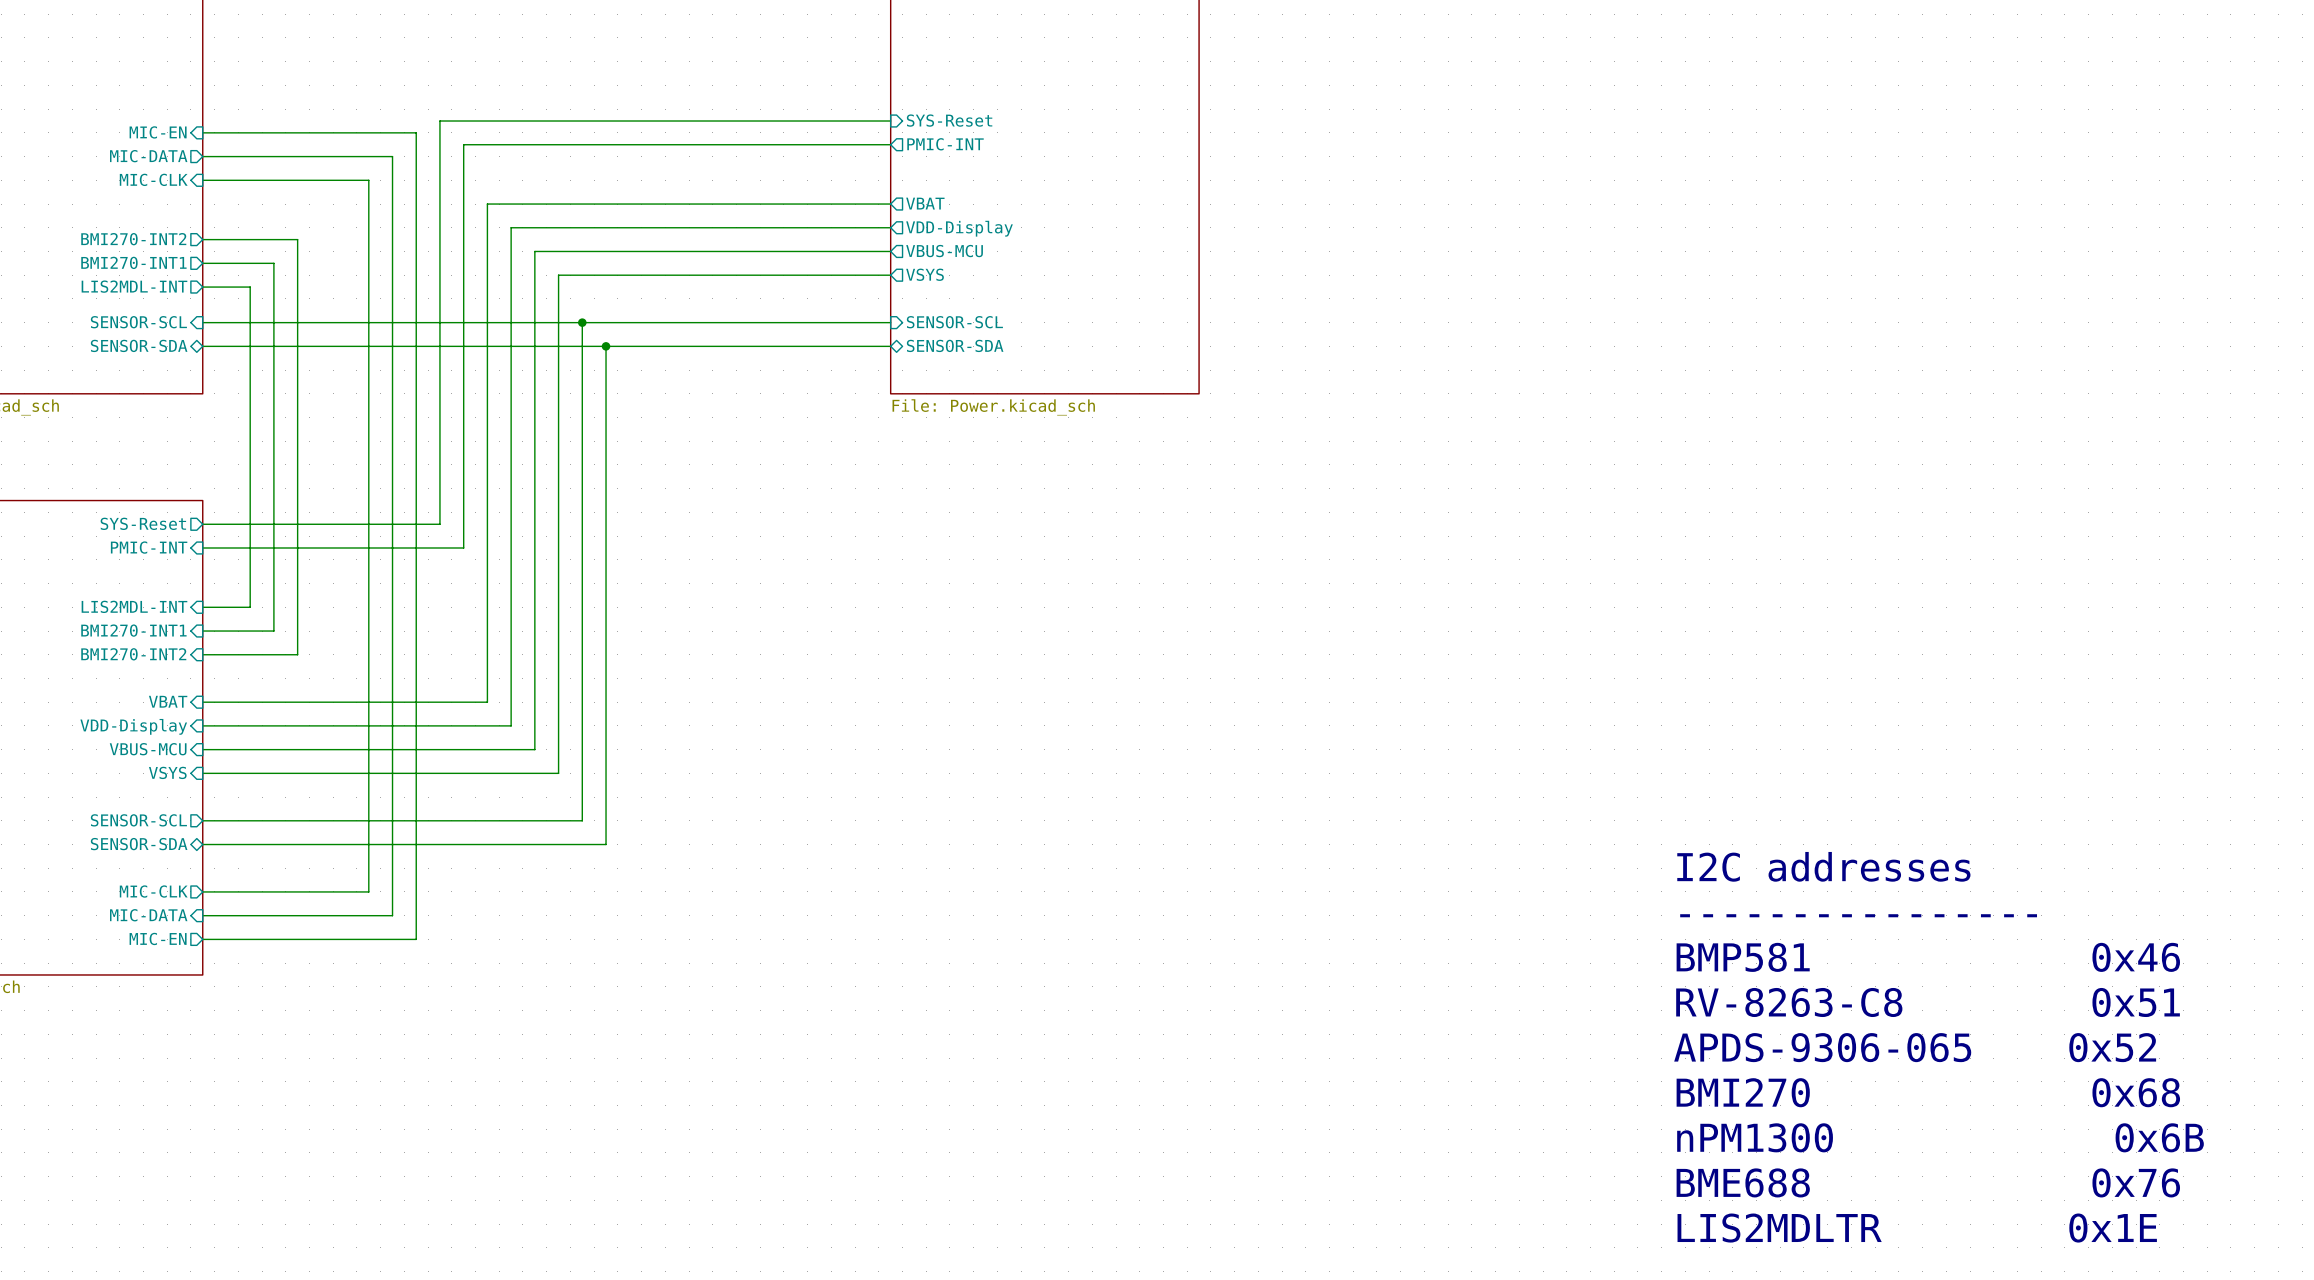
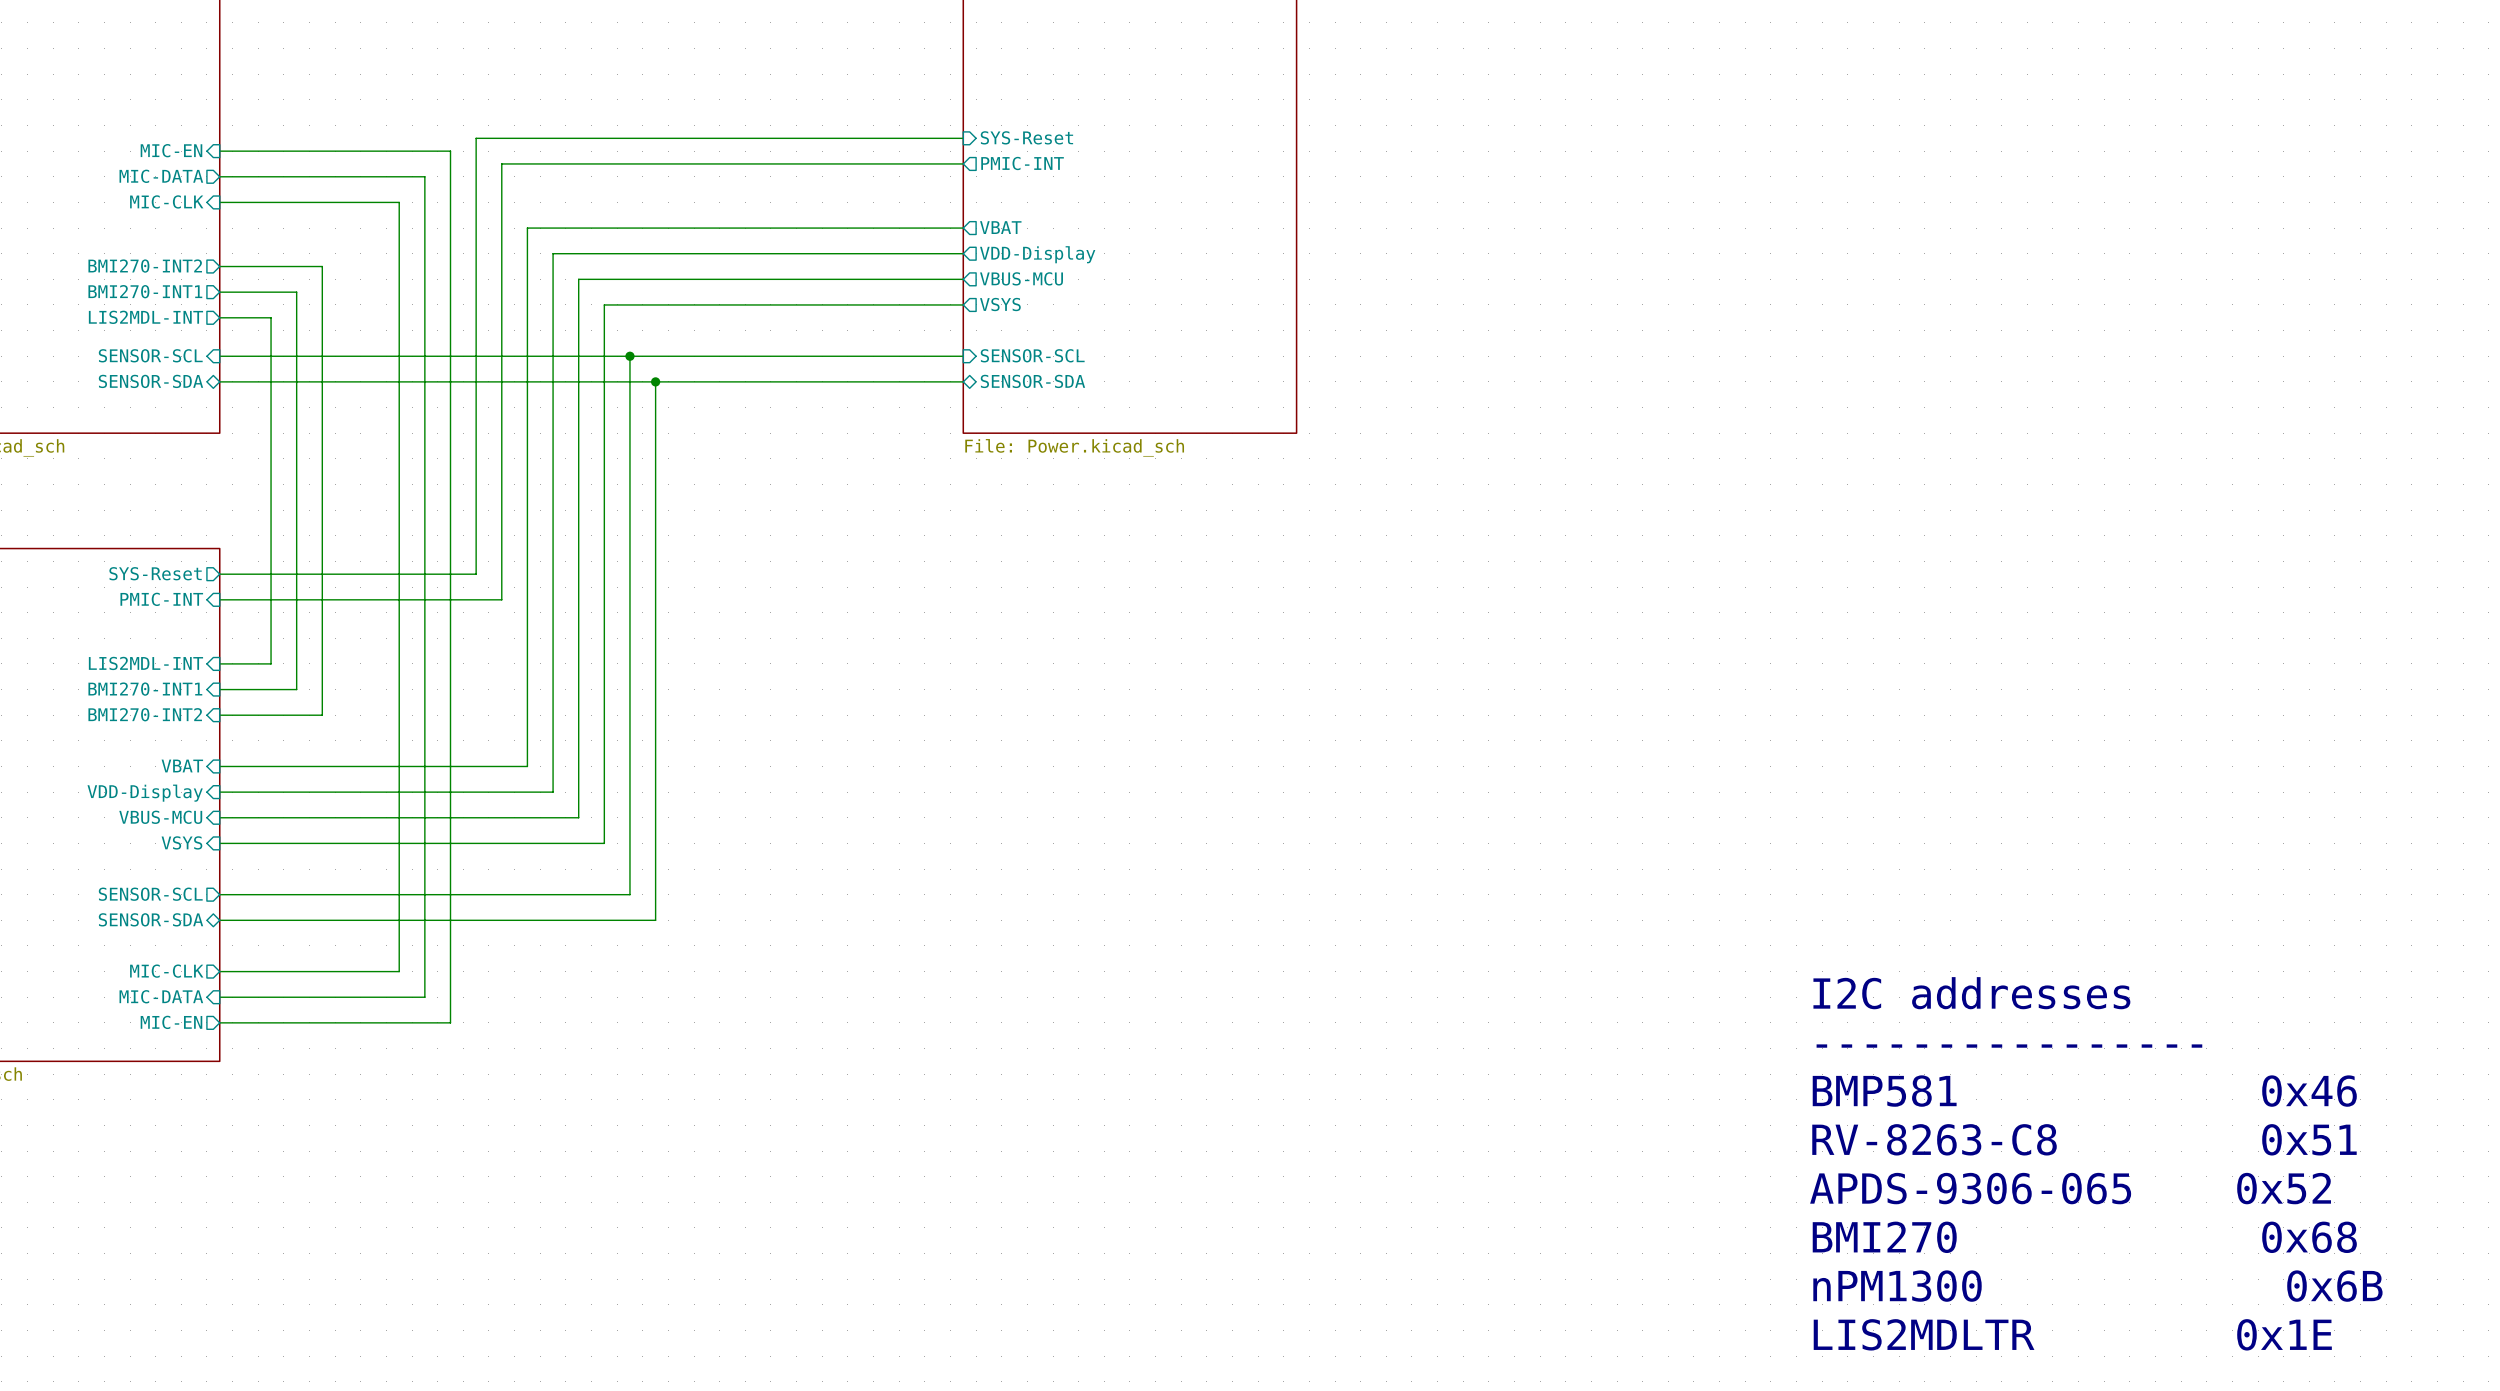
text: I2C addresses (1823, 866) -> none
text: ---------------- (1858, 915) -> I2C addresses (1971, 993)
text: BMP581 0x46 (1928, 957) -> ---------------- (2009, 1046)
text: RV-8263-C8 0x51 (1928, 1002) -> BMP581 0x46 (2084, 1091)
text: APDS-9306-065 0x52 (1915, 1047) -> RV-8263-C8 0x51 (2084, 1139)
text: BMI270 0x68 (1928, 1092) -> APDS-9306-065 0x52 (2070, 1188)
text: nPM1300 0x6B (1940, 1137) -> BMI270 0x68 (2084, 1237)
text: BME688 0x76 (1928, 1182) -> nPM1300 0x6B (2097, 1286)

